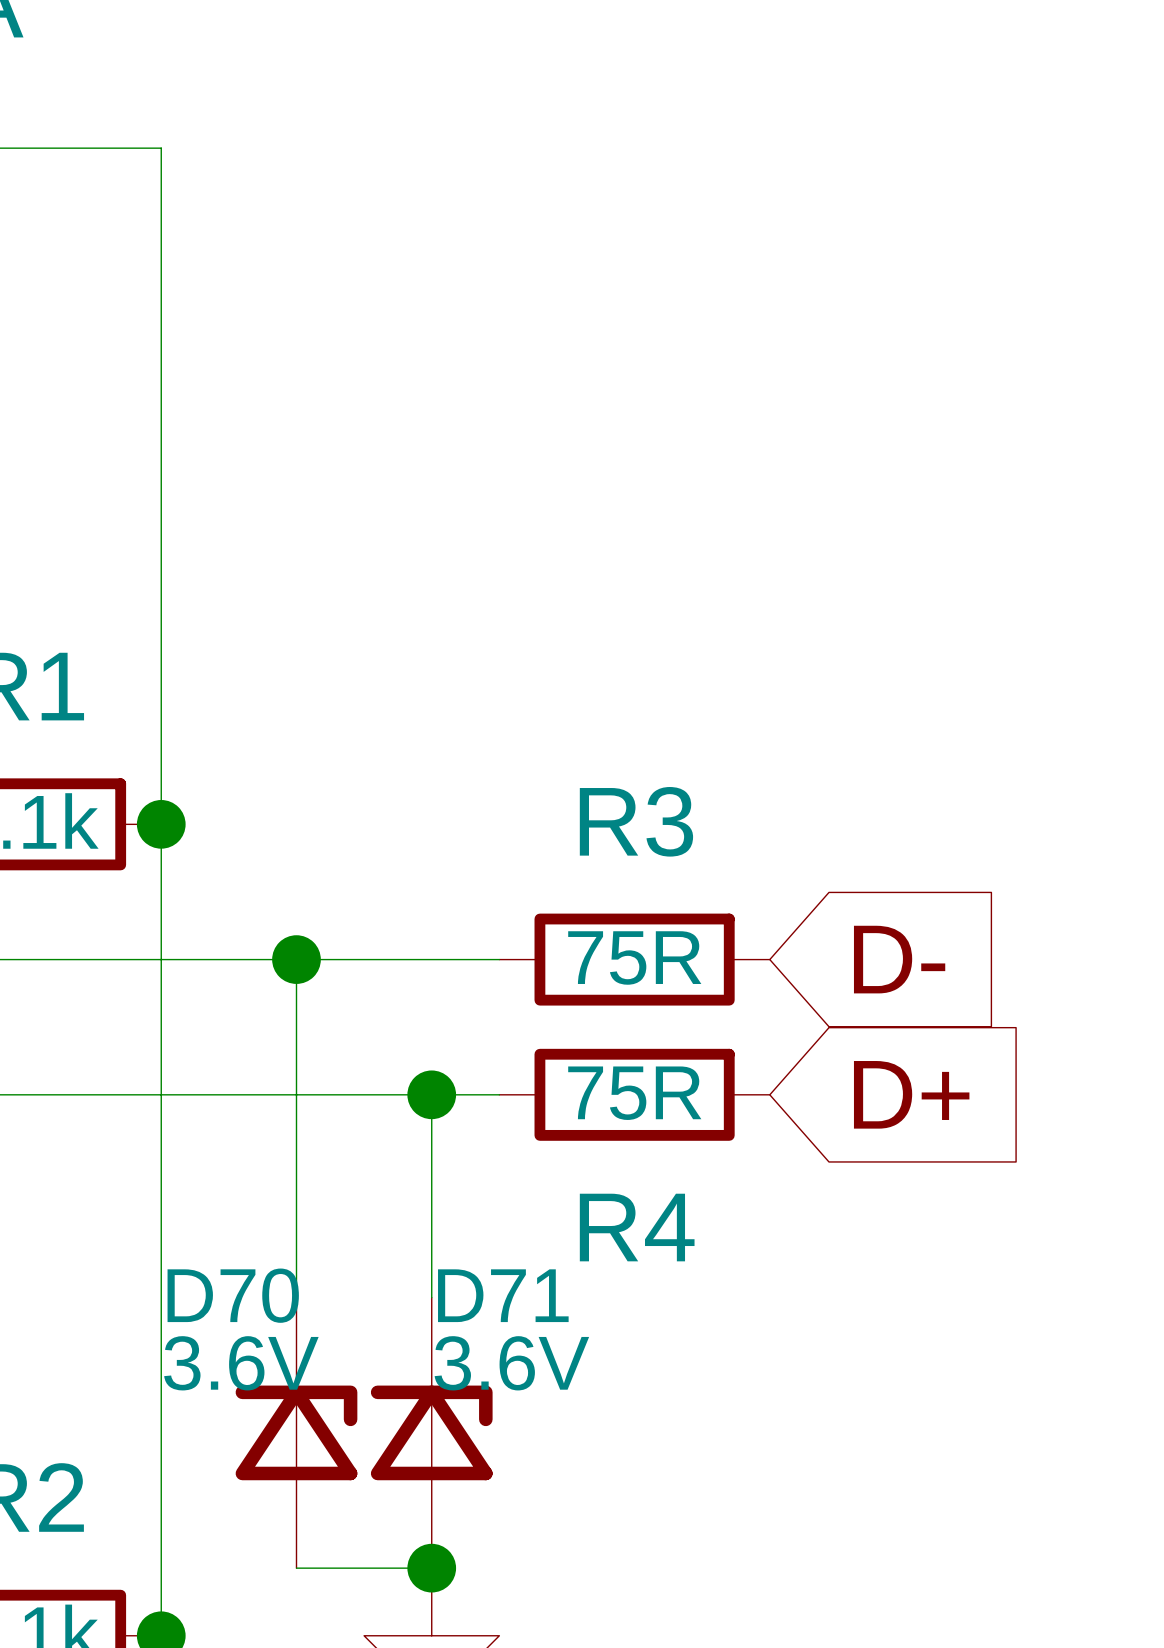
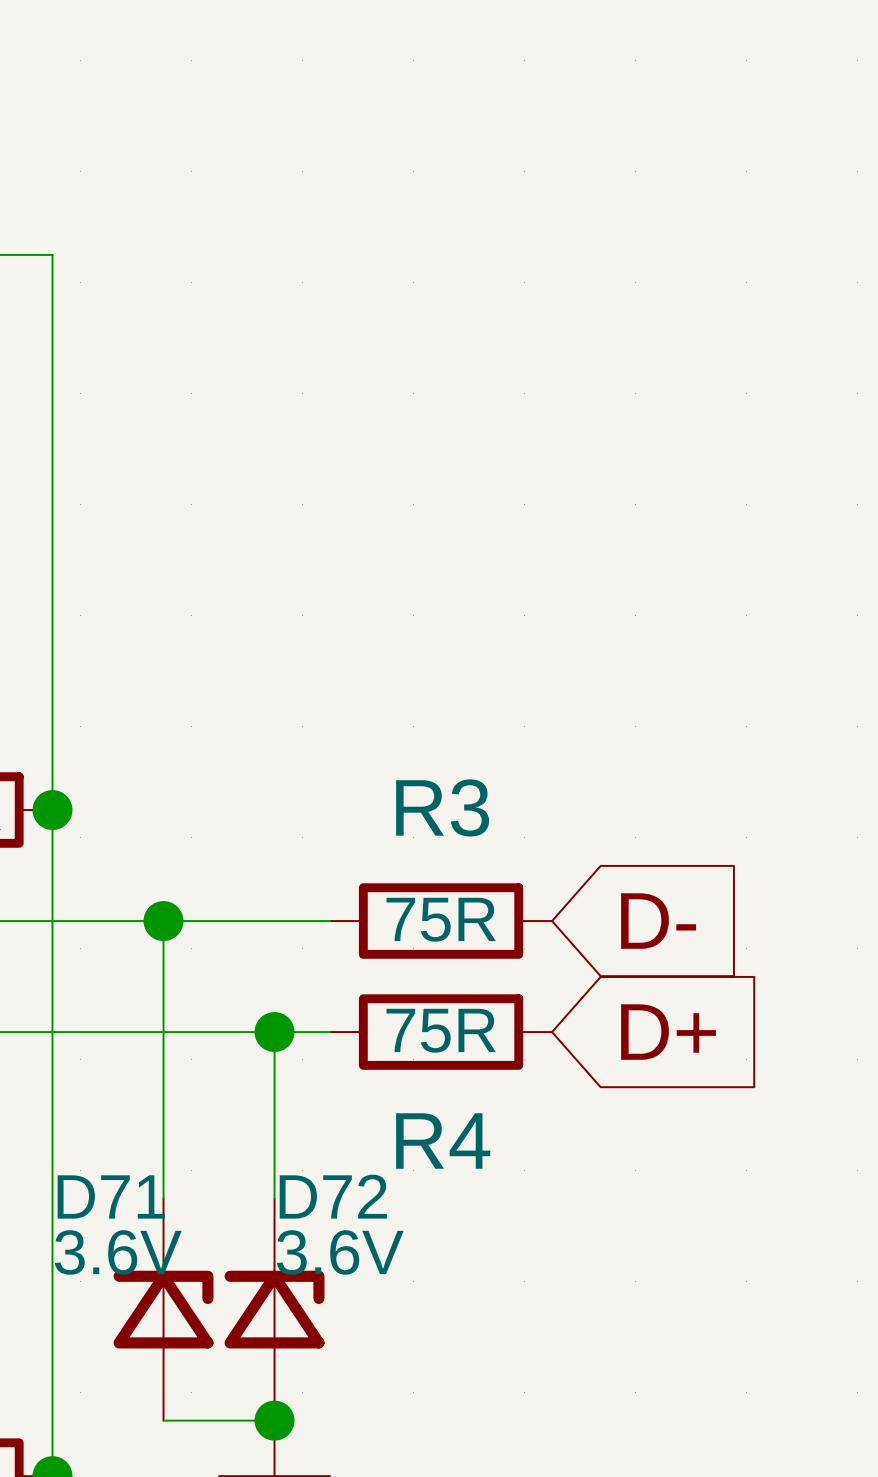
D70 name: D70 (233, 1295) -> D71 (111, 1196)
D71 name: D71 (503, 1295) -> D72 (333, 1196)

